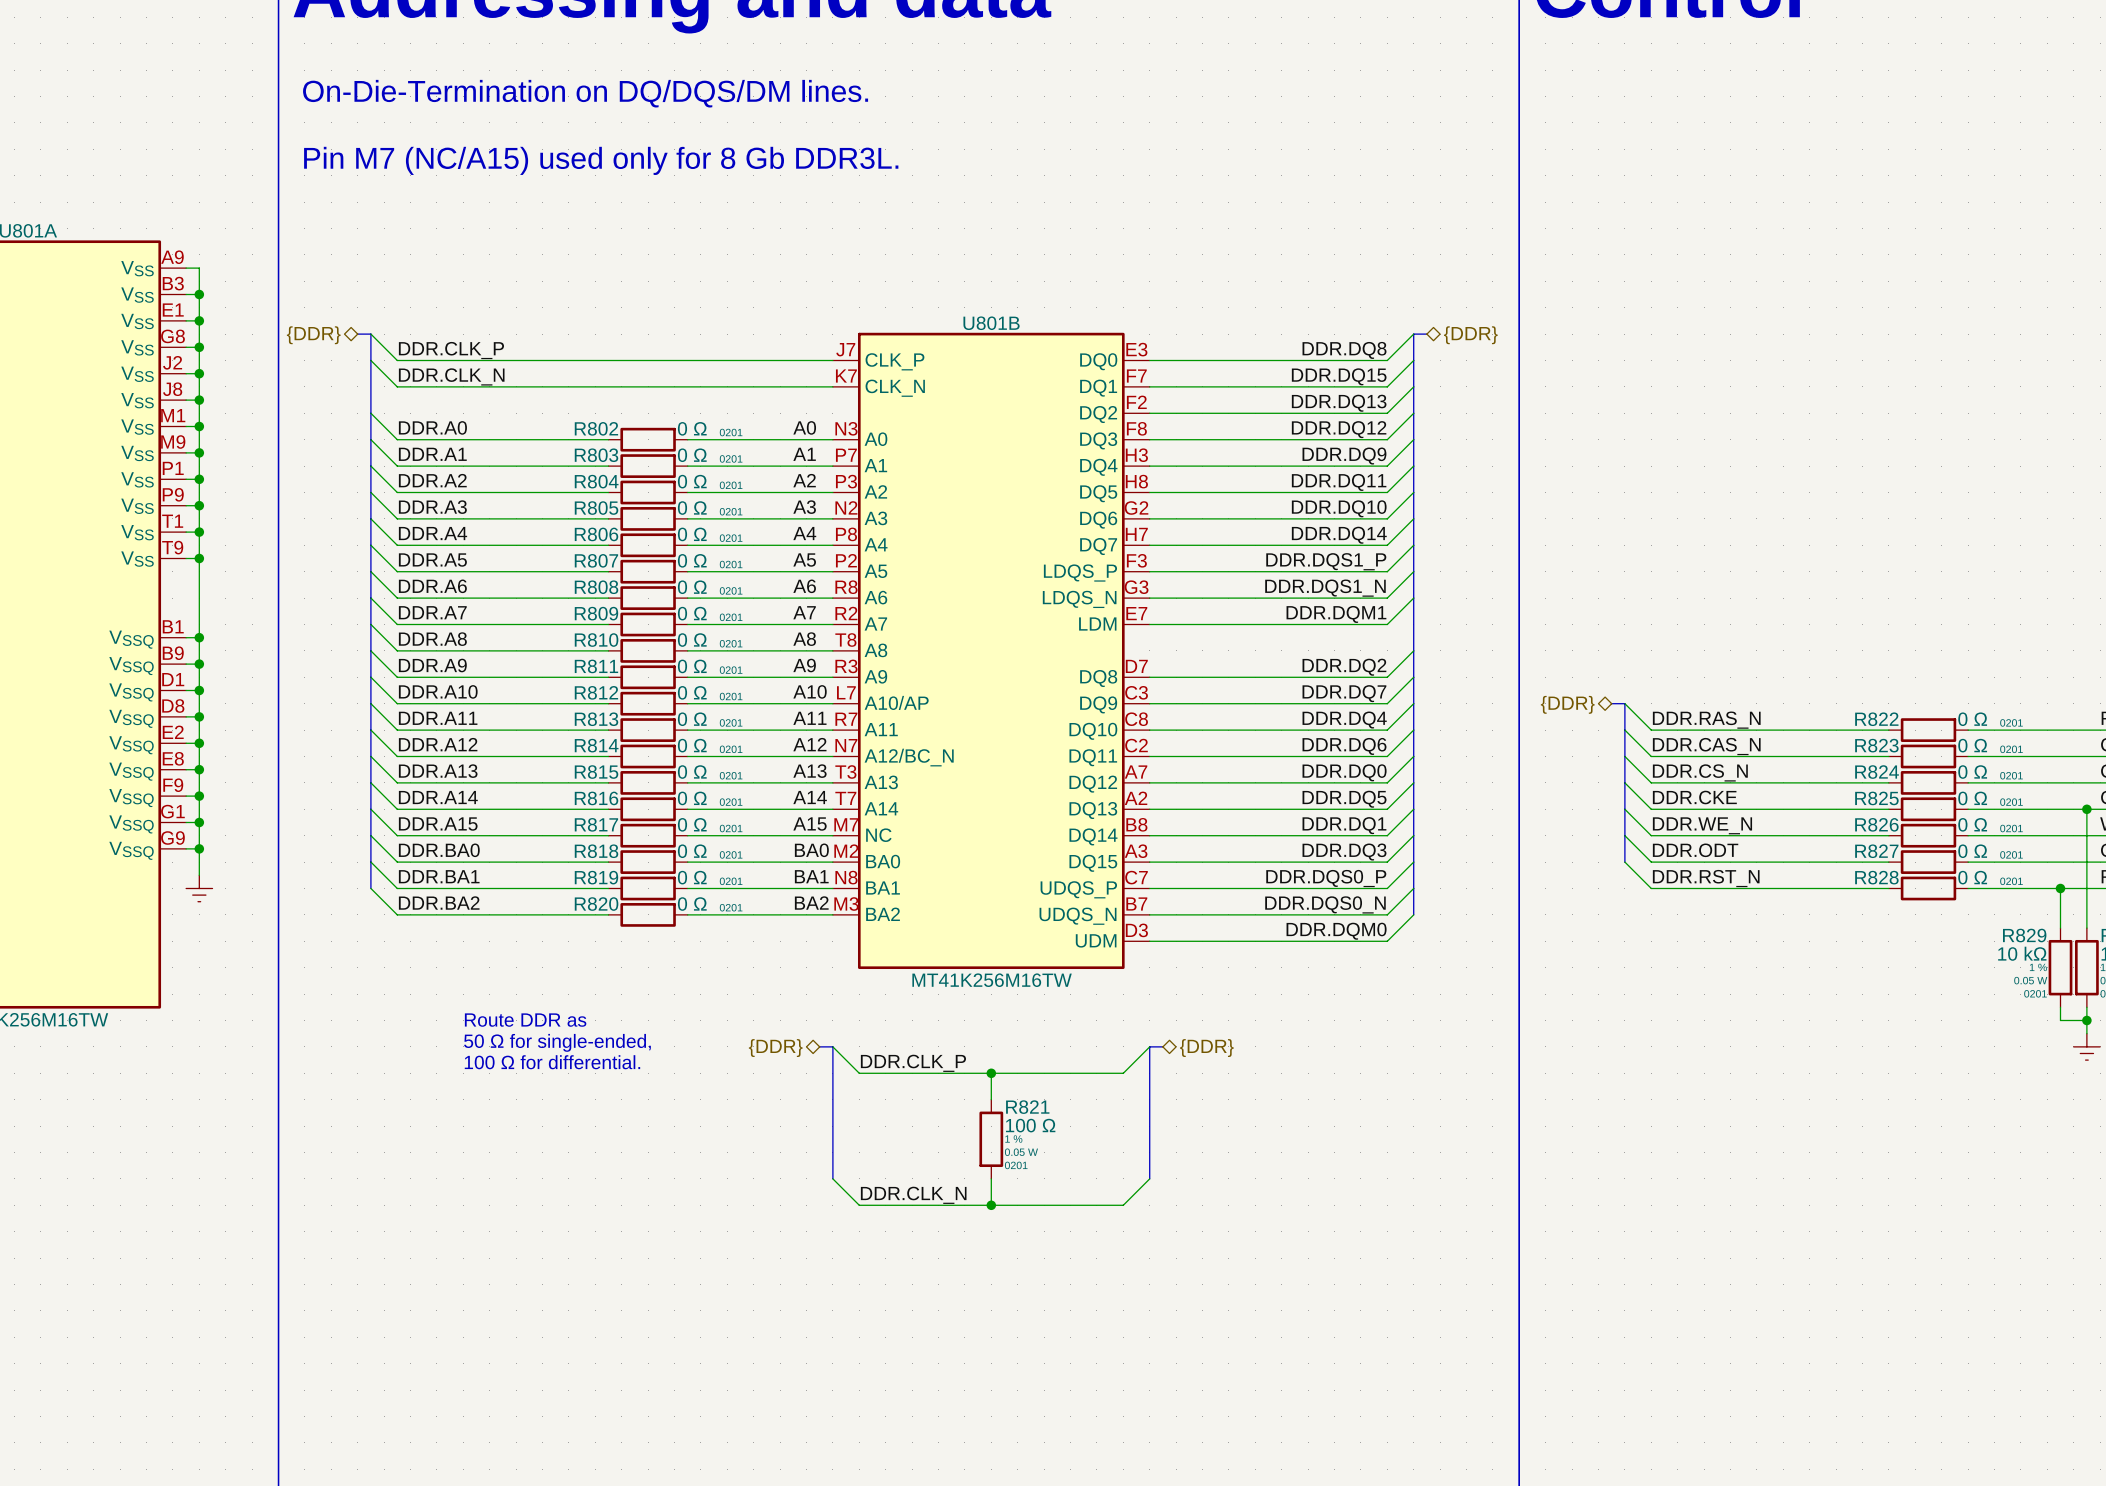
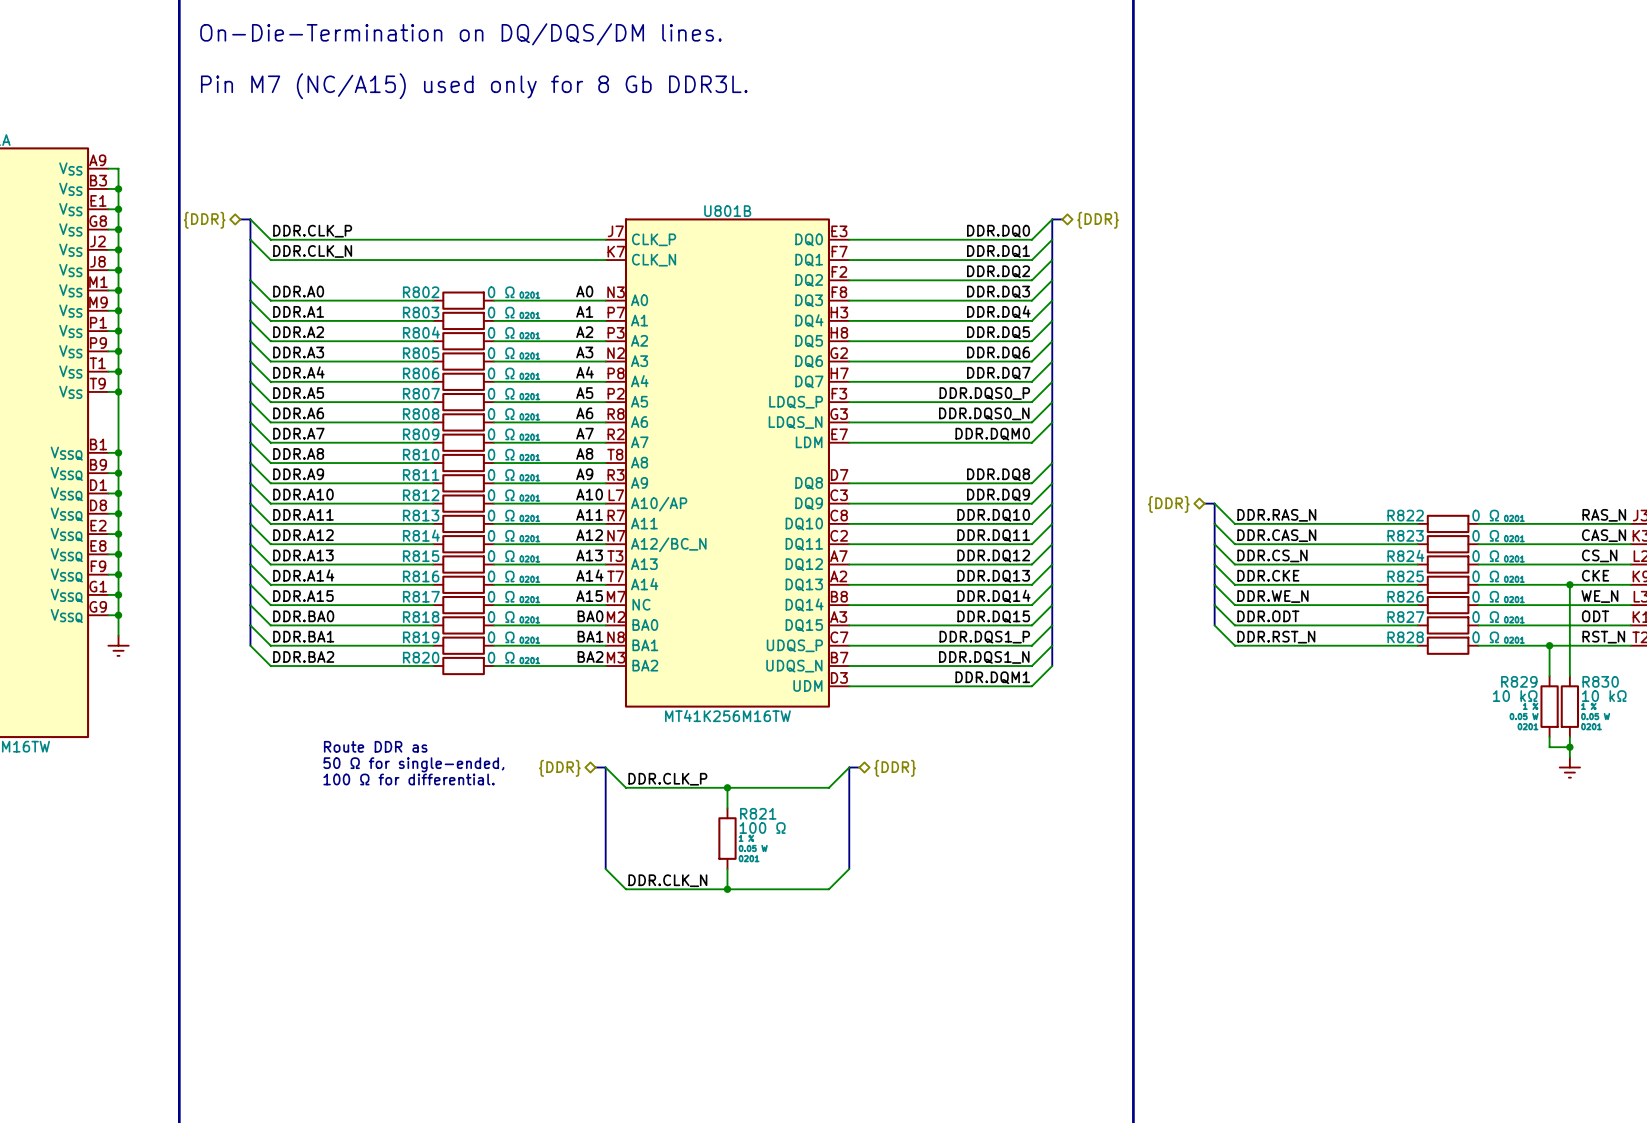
label: DDR.DQ8 (1344, 350) -> DDR.DQ0 (998, 231)
label: DDR.DQ15 (1339, 376) -> DDR.DQ1 (998, 251)
label: DDR.DQ13 (1339, 403) -> DDR.DQ2 (998, 271)
label: DDR.DQ12 (1339, 429) -> DDR.DQ3 (998, 292)
label: DDR.DQ9 (1344, 456) -> DDR.DQ4 (998, 312)
label: DDR.DQ11 (1339, 482) -> DDR.DQ5 (998, 332)
label: DDR.DQ10 (1339, 508) -> DDR.DQ6 (998, 352)
label: DDR.DQ14 (1339, 535) -> DDR.DQ7 (998, 373)
label: DDR.DQS1_P (1326, 561) -> DDR.DQS0_P (984, 393)
label: DDR.DQS1_N (1325, 588) -> DDR.DQS0_N (984, 413)
label: DDR.DQM1 (1336, 614) -> DDR.DQM0 (992, 434)
label: DDR.DQ2 (1344, 667) -> DDR.DQ8 (998, 474)
label: DDR.DQ7 (1344, 693) -> DDR.DQ9 (998, 495)
label: DDR.DQ4 (1344, 720) -> DDR.DQ10 (993, 515)
label: DDR.DQ6 (1344, 746) -> DDR.DQ11 (993, 535)
label: DDR.DQ0 (1344, 772) -> DDR.DQ12 (993, 555)
label: DDR.DQ5 (1344, 799) -> DDR.DQ13 (993, 576)
label: DDR.DQ1 (1344, 825) -> DDR.DQ14 (993, 596)
label: DDR.DQ3 (1344, 852) -> DDR.DQ15 (993, 616)
label: DDR.DQS0_P (1326, 878) -> DDR.DQS1_P (984, 637)
label: DDR.DQS0_N (1325, 904) -> DDR.DQS1_N (984, 657)
label: DDR.DQM0 (1336, 931) -> DDR.DQM1 (992, 677)

